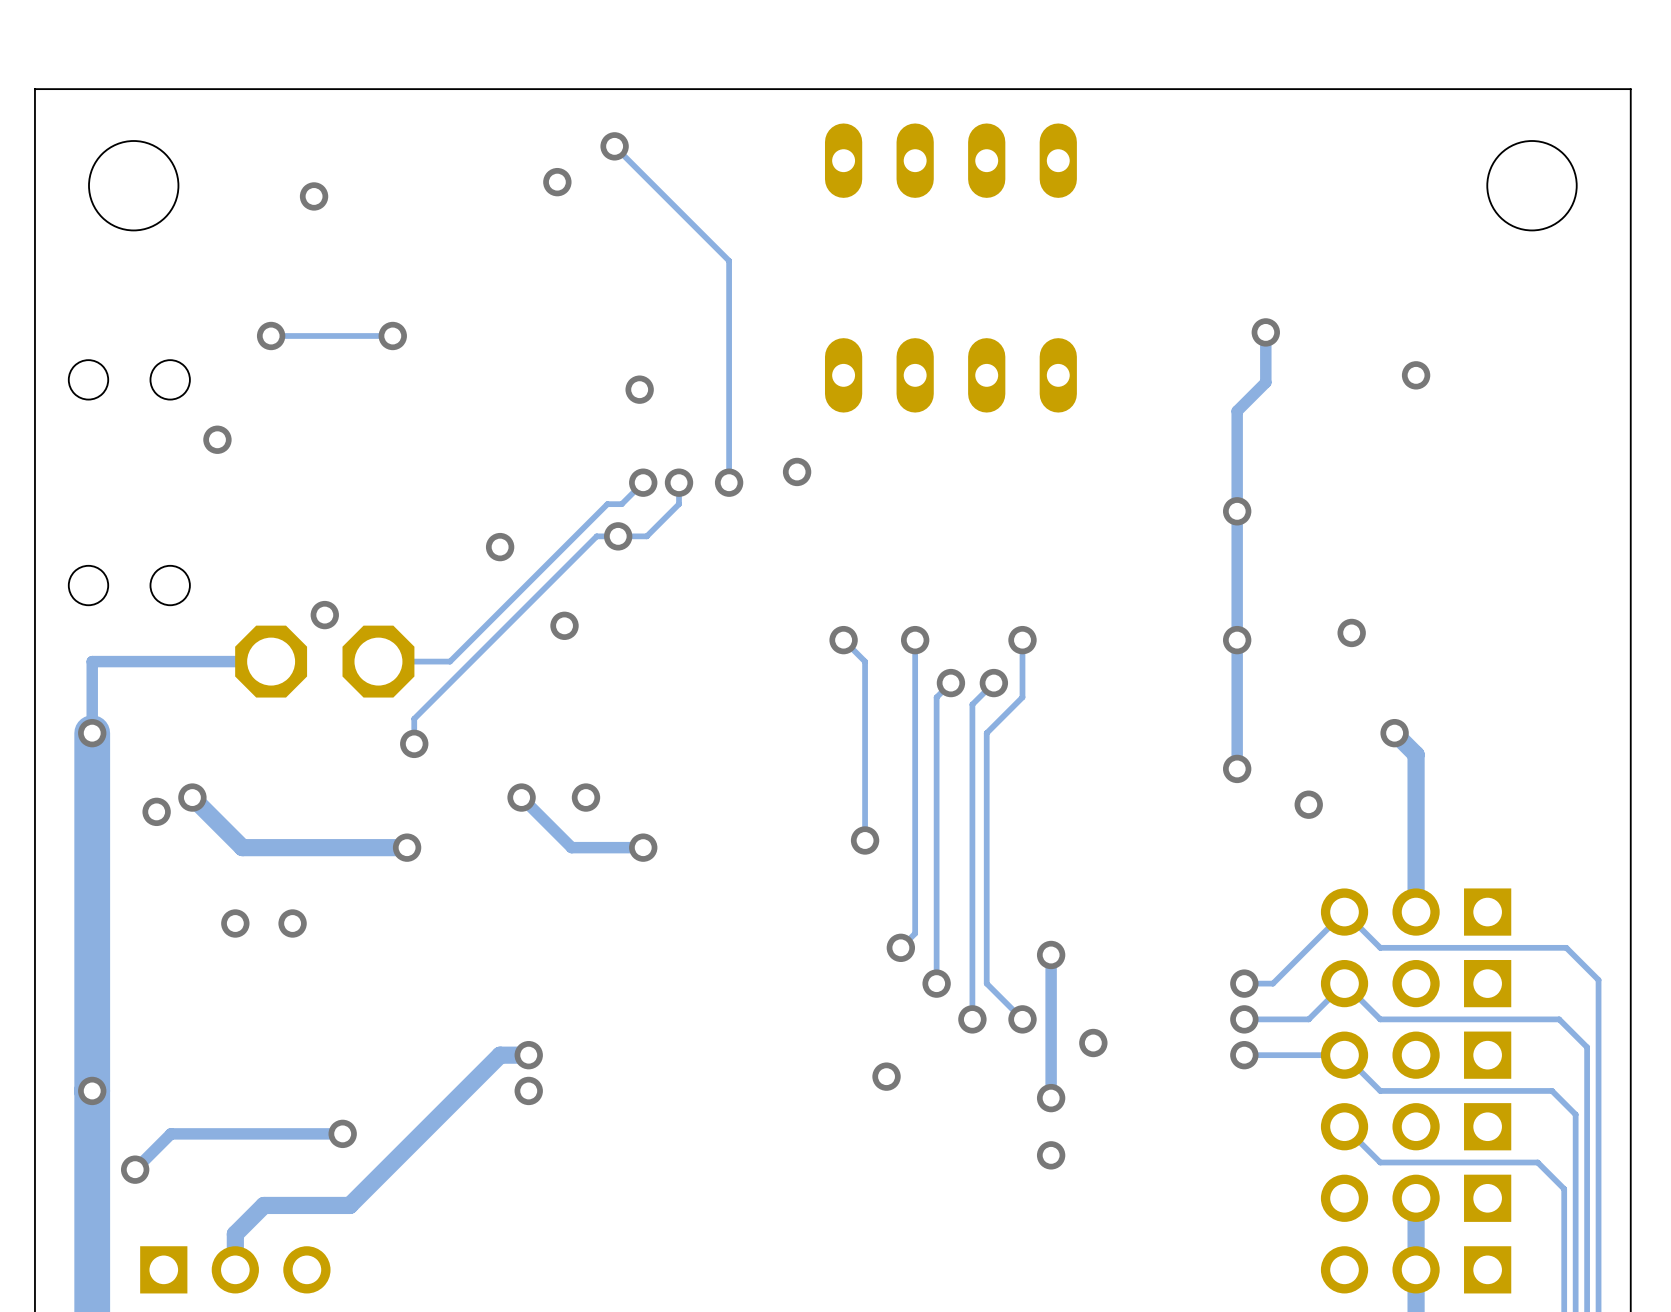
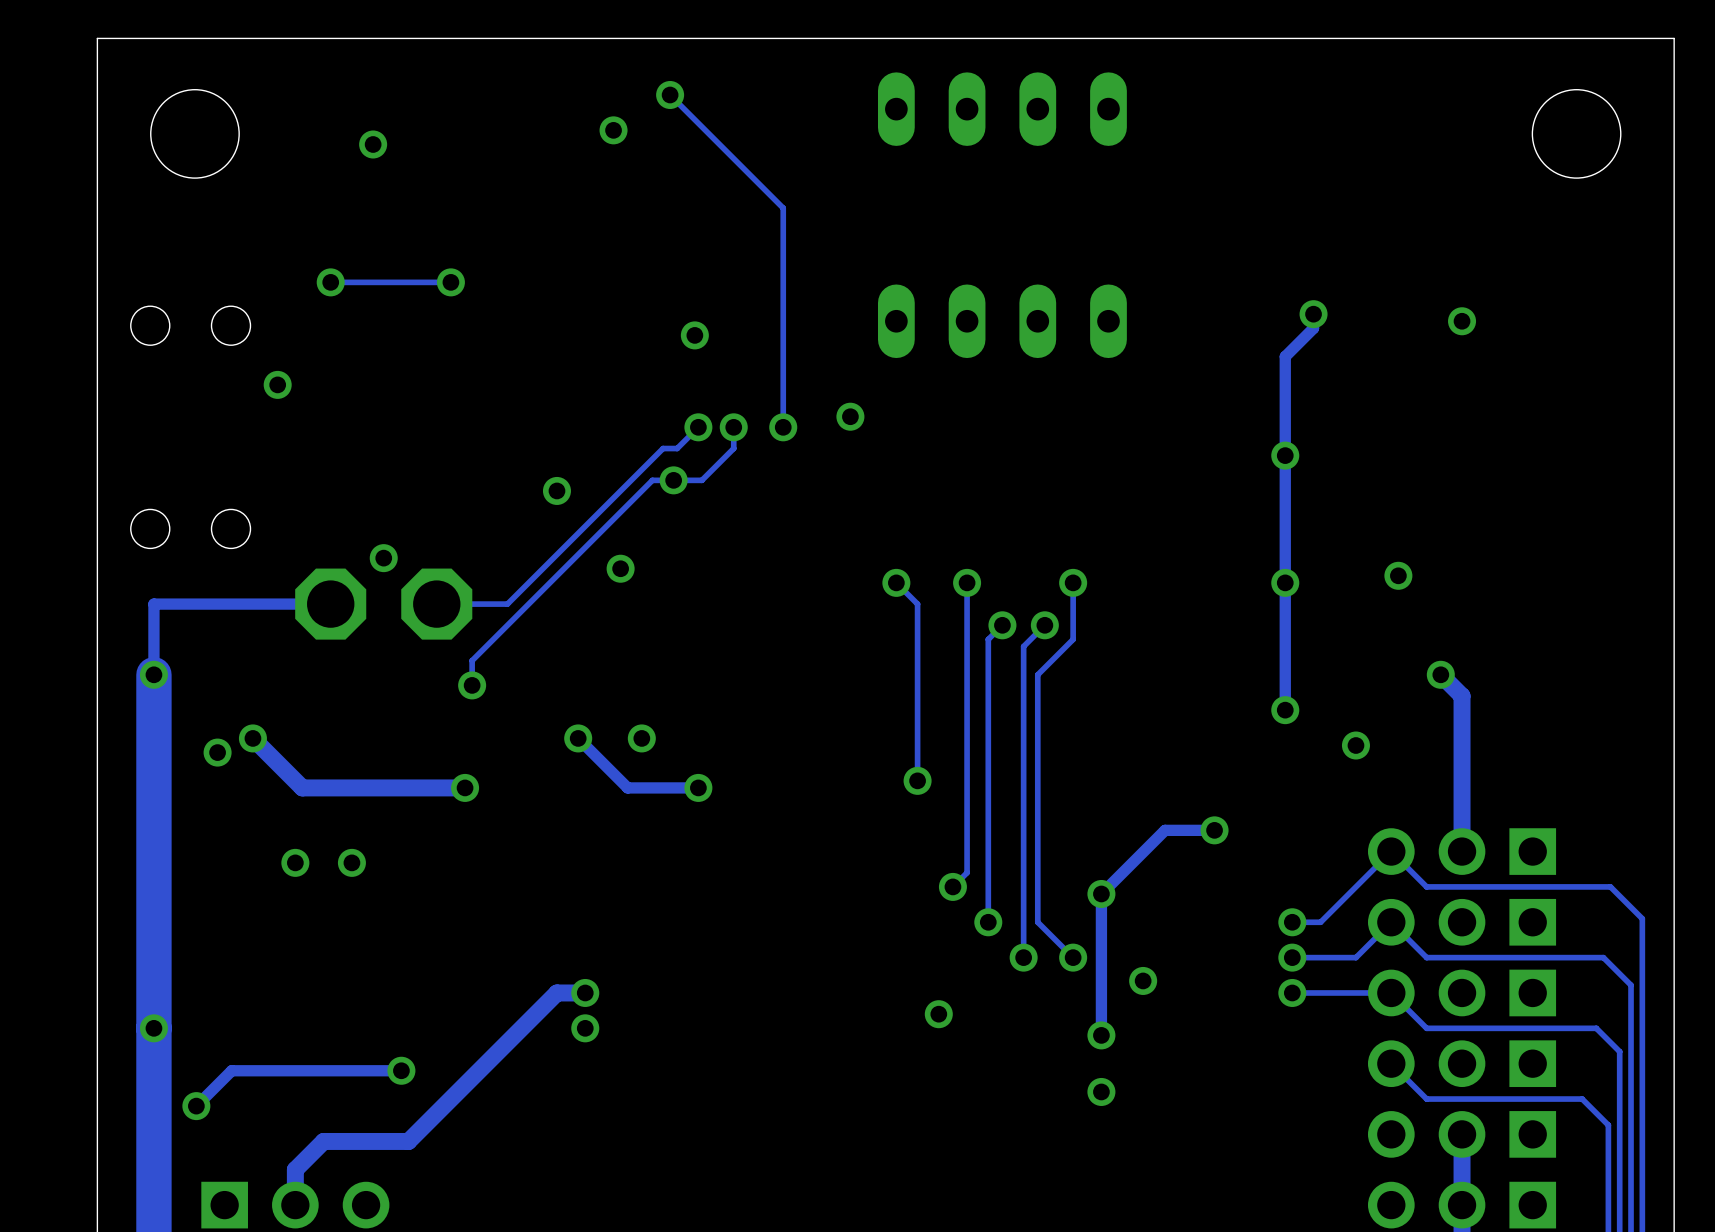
track: (1265, 332) (1265, 368) -> none
via position: (1265, 332) -> (1313, 314)
track: none -> (1214, 830) (1165, 830) (1101, 893)
via: none -> (1214, 830)

